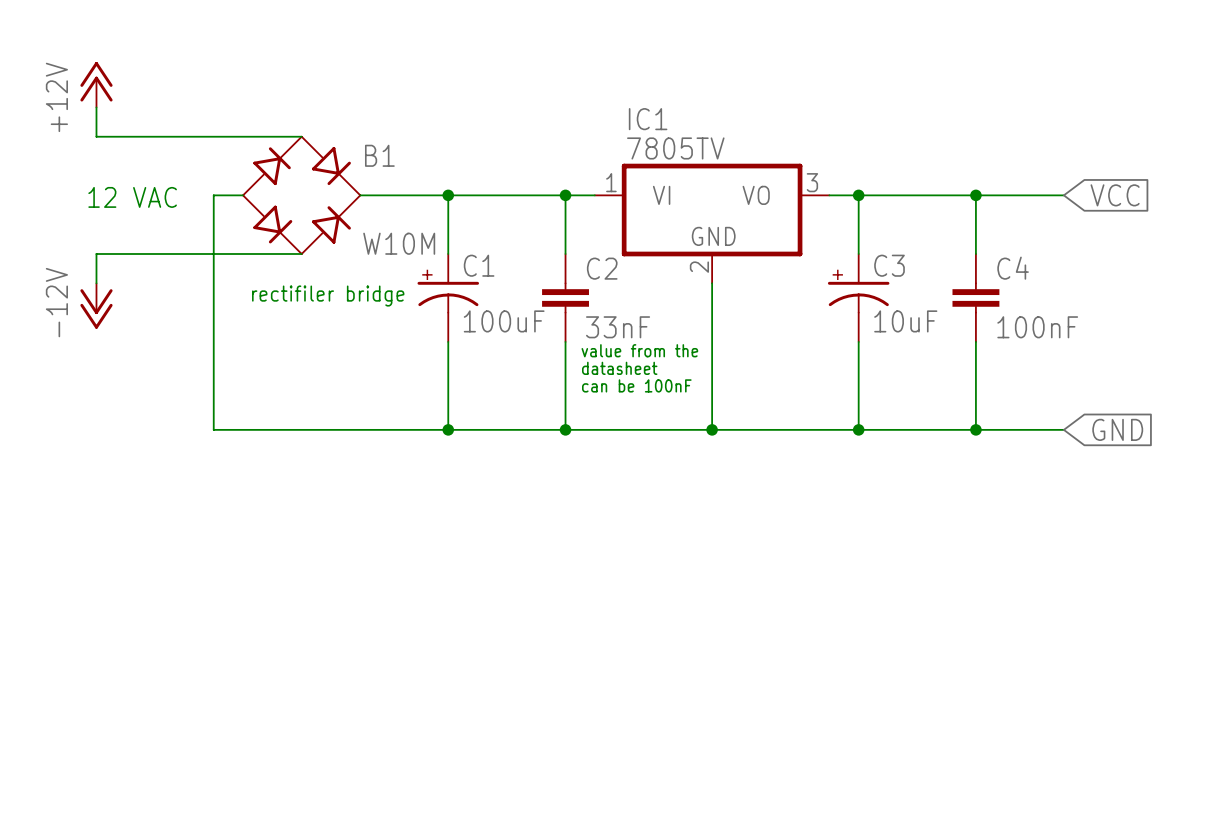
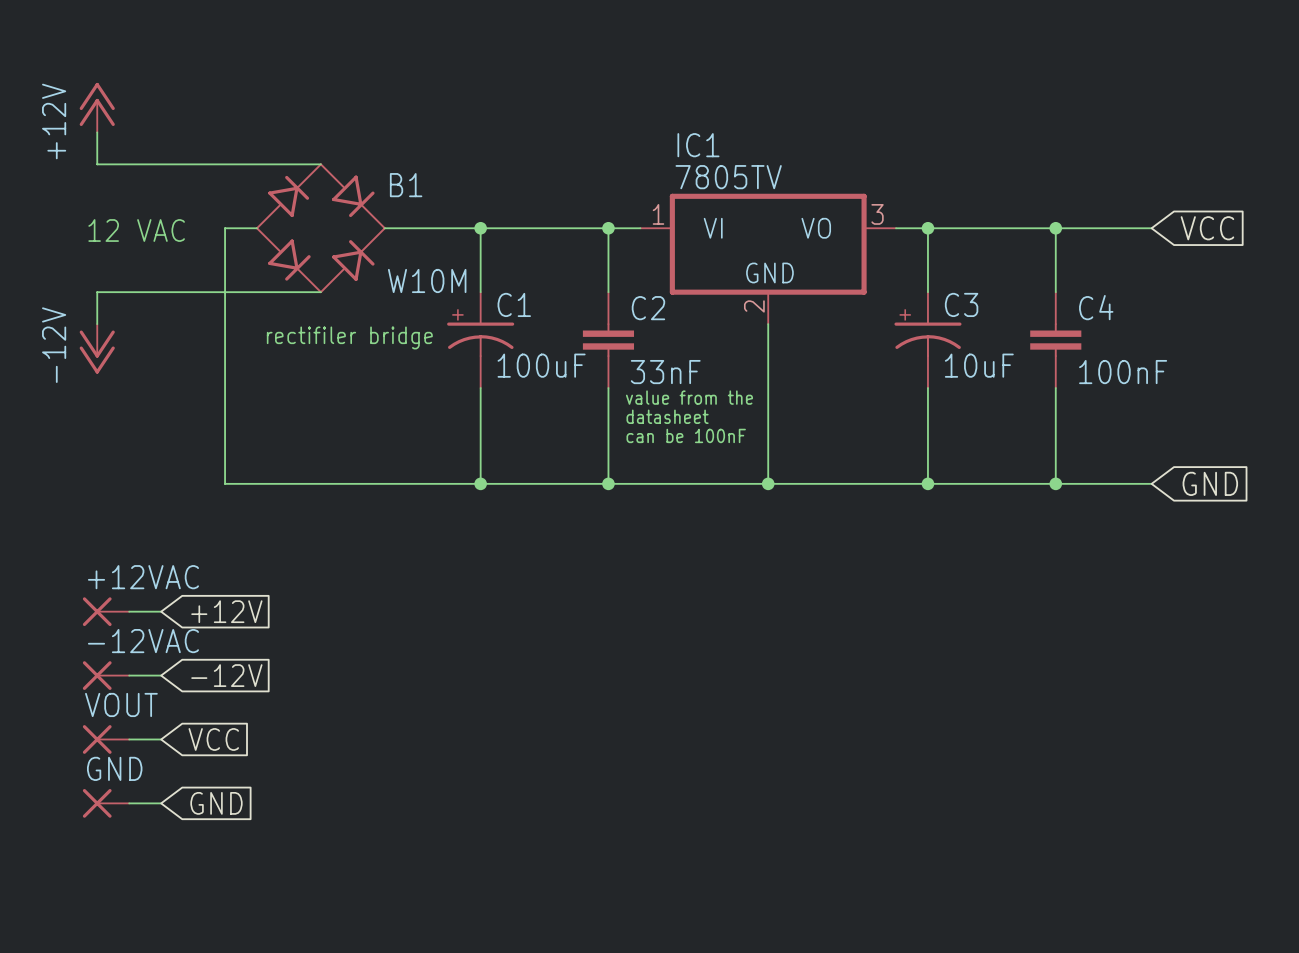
+12VAC: none -> (106, 611)
wire: none -> (129, 611) (161, 611)
global label: none -> +12V (226, 611)
-12VAC: none -> (106, 675)
wire: none -> (129, 675) (161, 675)
global label: none -> -12V (226, 675)
VOUT: none -> (106, 739)
wire: none -> (129, 739) (161, 739)
global label: none -> VCC (213, 739)
GND: none -> (106, 803)
wire: none -> (129, 803) (161, 803)
global label: none -> GND (216, 803)

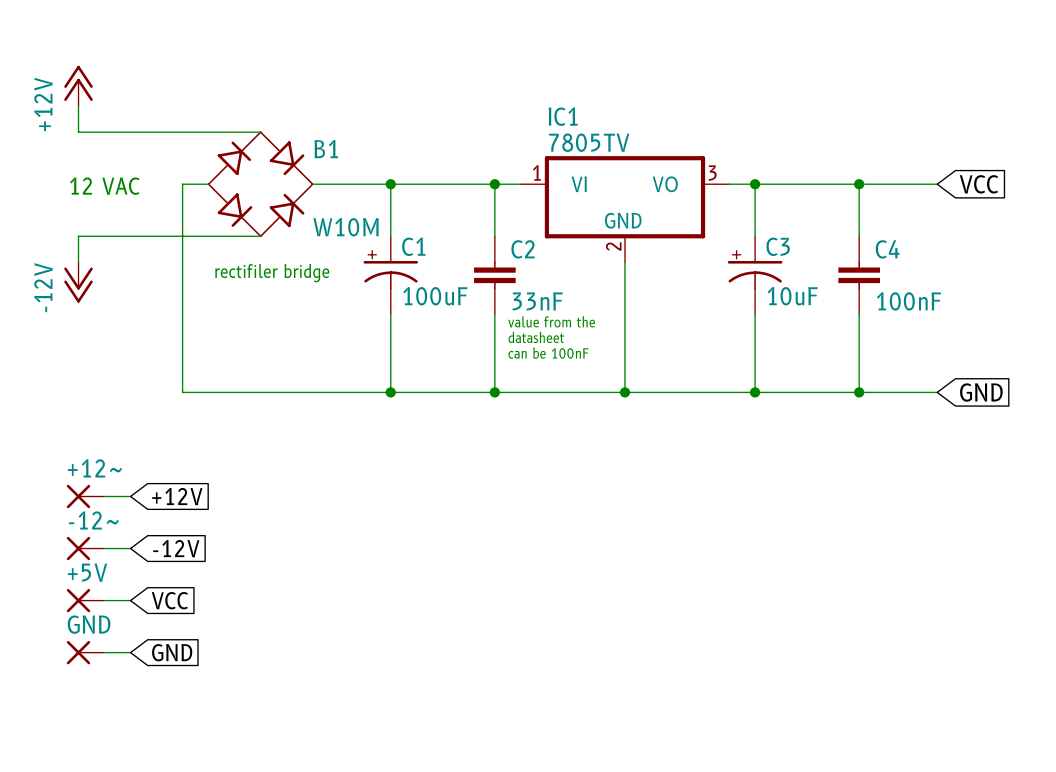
+12VAC name: +12VAC (143, 577) -> +12~ (94, 468)
-12VAC name: -12VAC (143, 641) -> -12~ (93, 520)
VOUT name: VOUT (121, 704) -> +5V (87, 572)

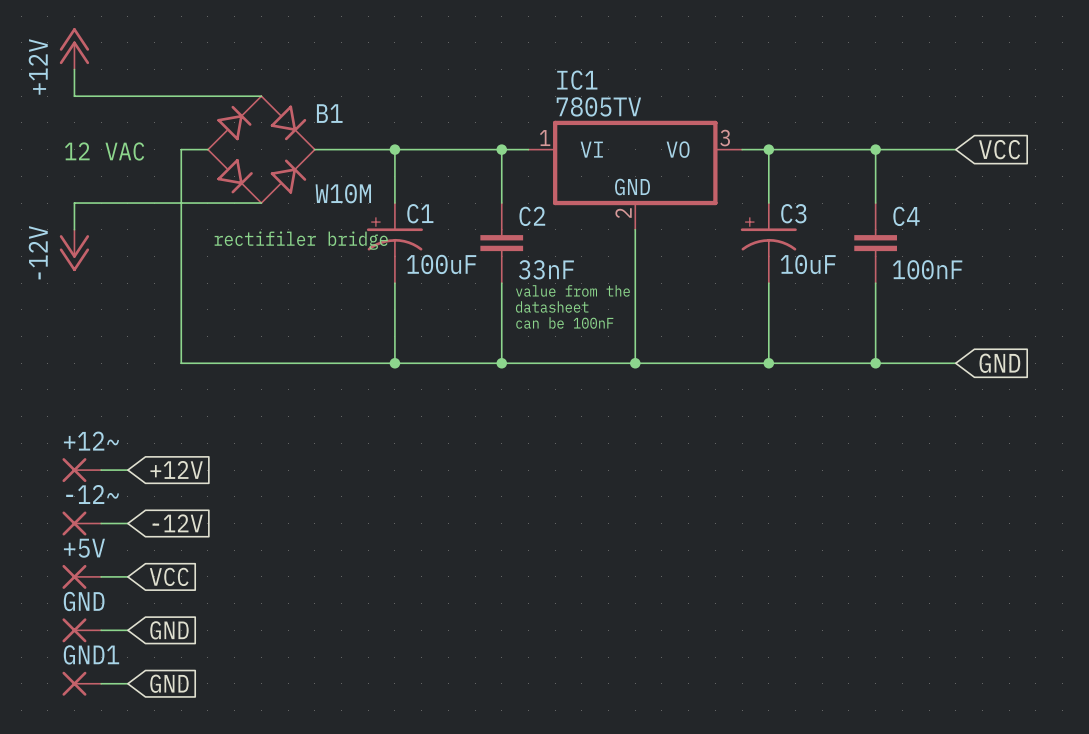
GND1: none -> (81, 683)
wire: none -> (101, 683) (127, 683)
global label: none -> GND (169, 683)

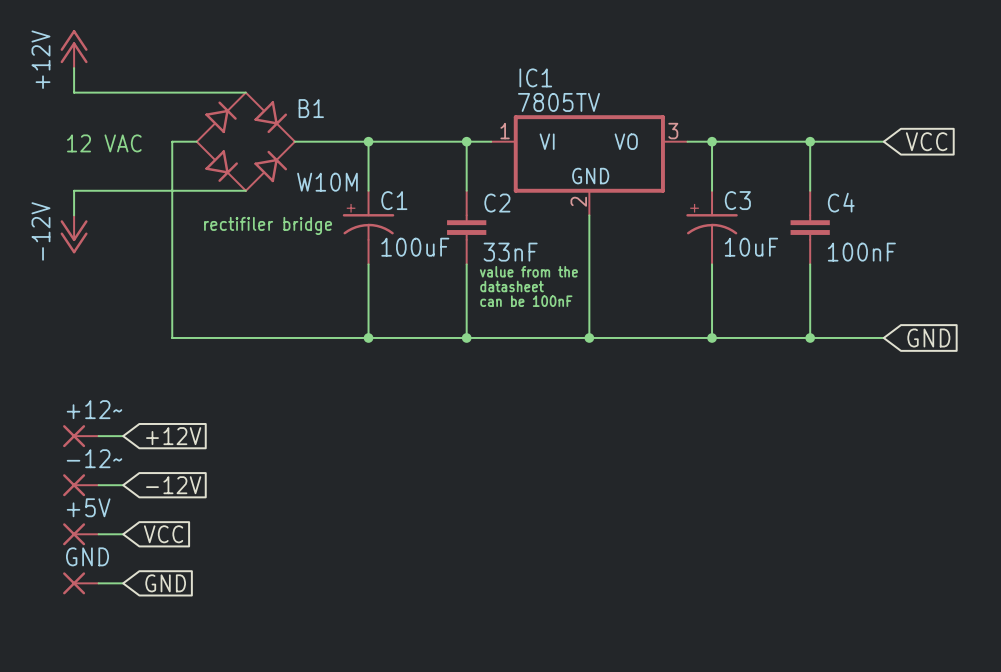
GND1: (81, 683) -> none
wire: (101, 683) (127, 683) -> none
global label: GND (169, 683) -> none

